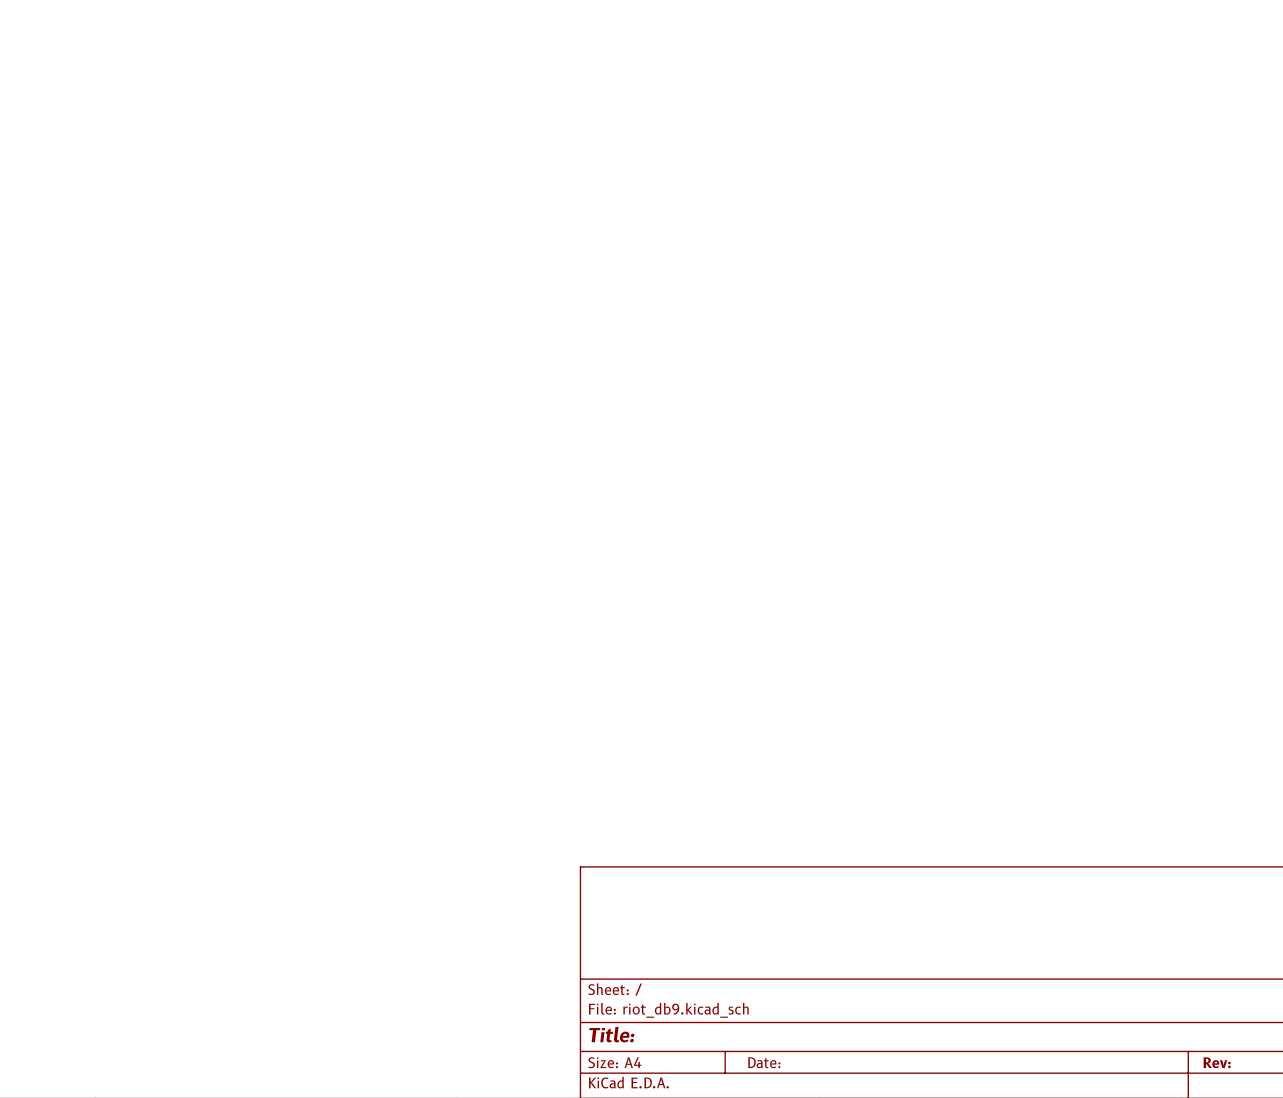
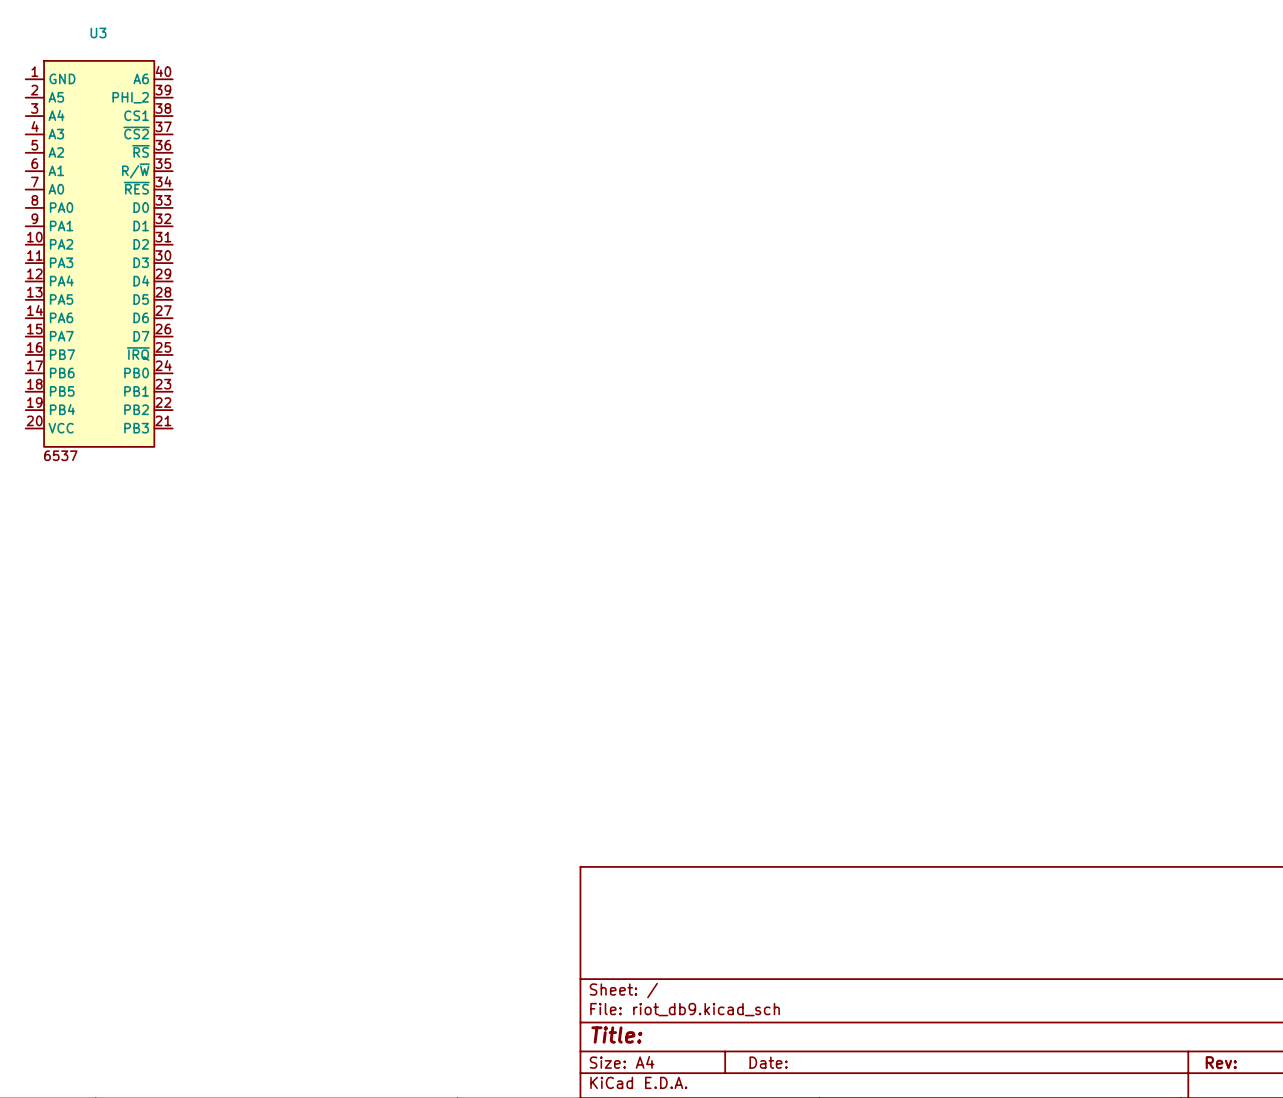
U3: none -> (99, 253)

